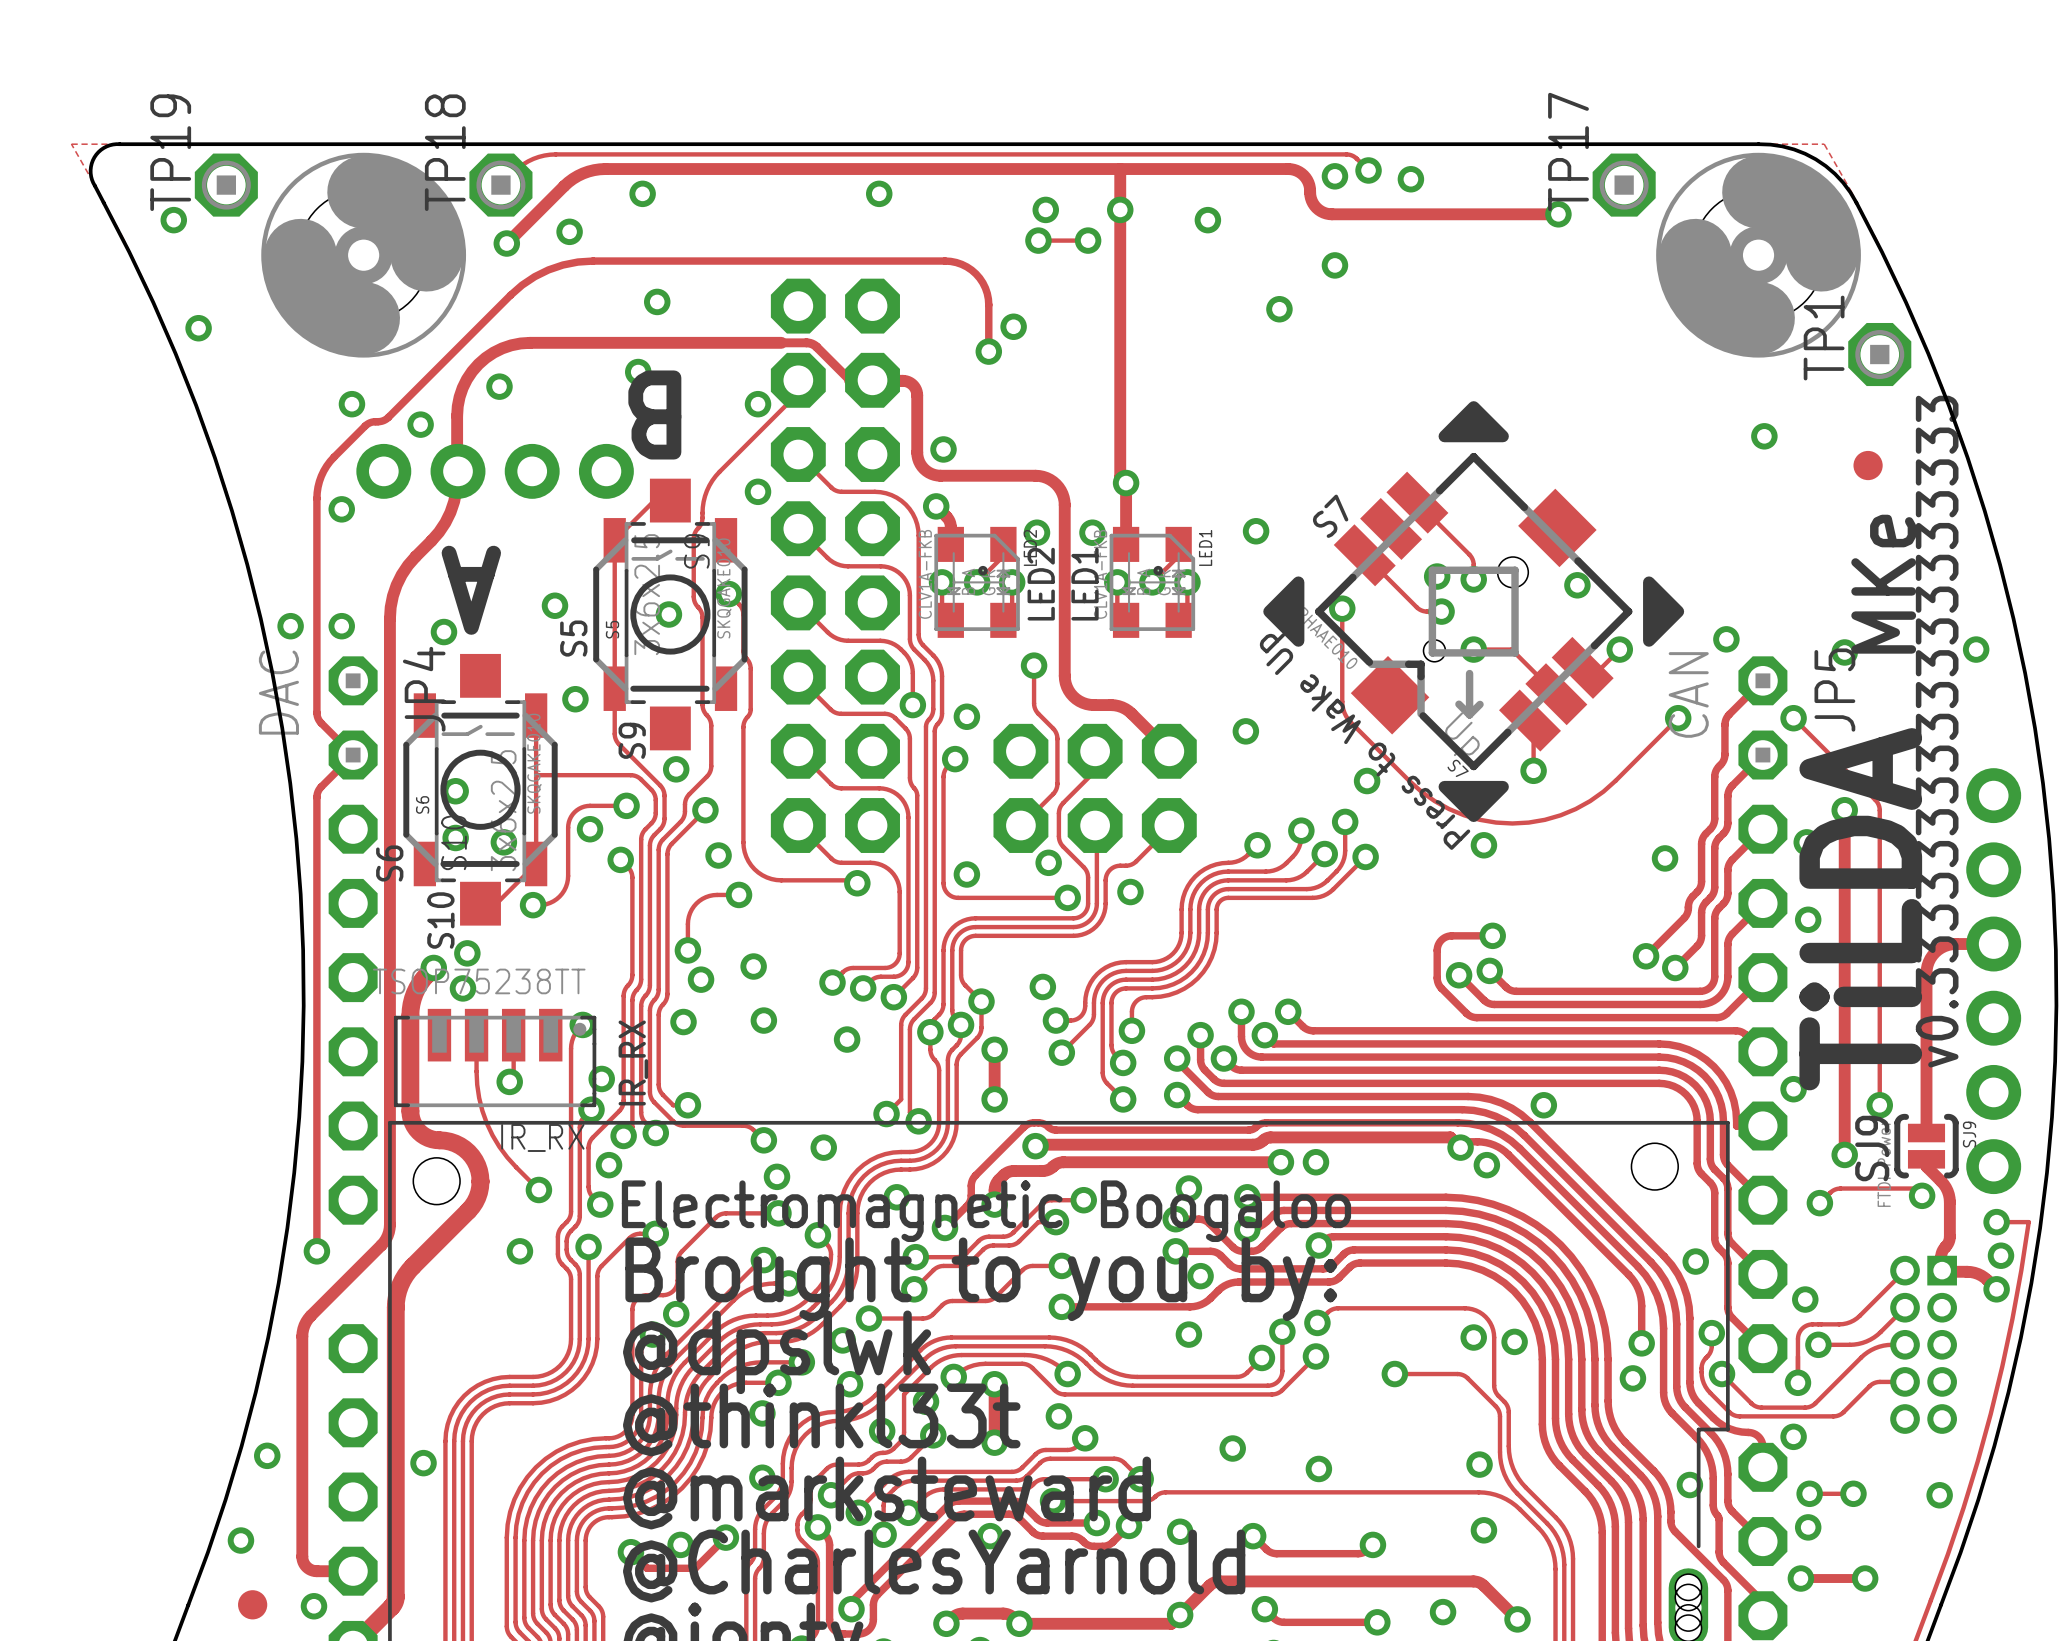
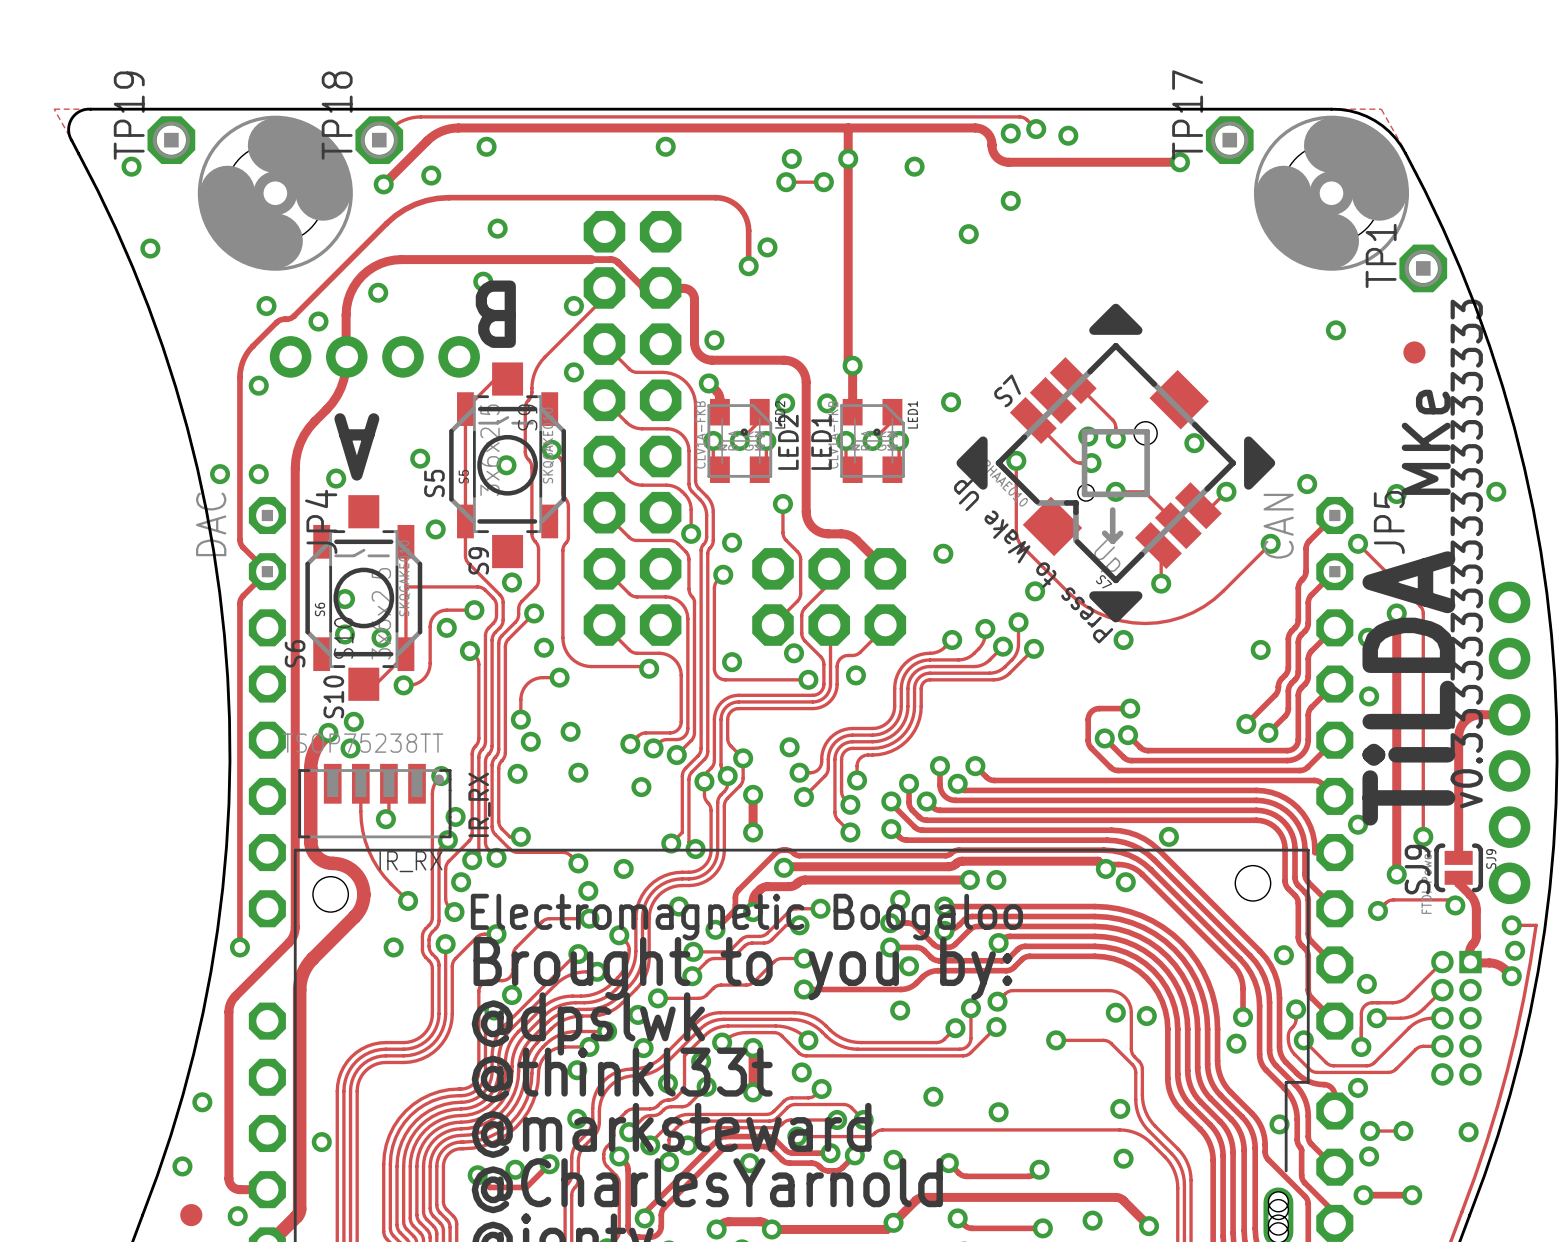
via position: (423, 1463) -> (321, 1142)

